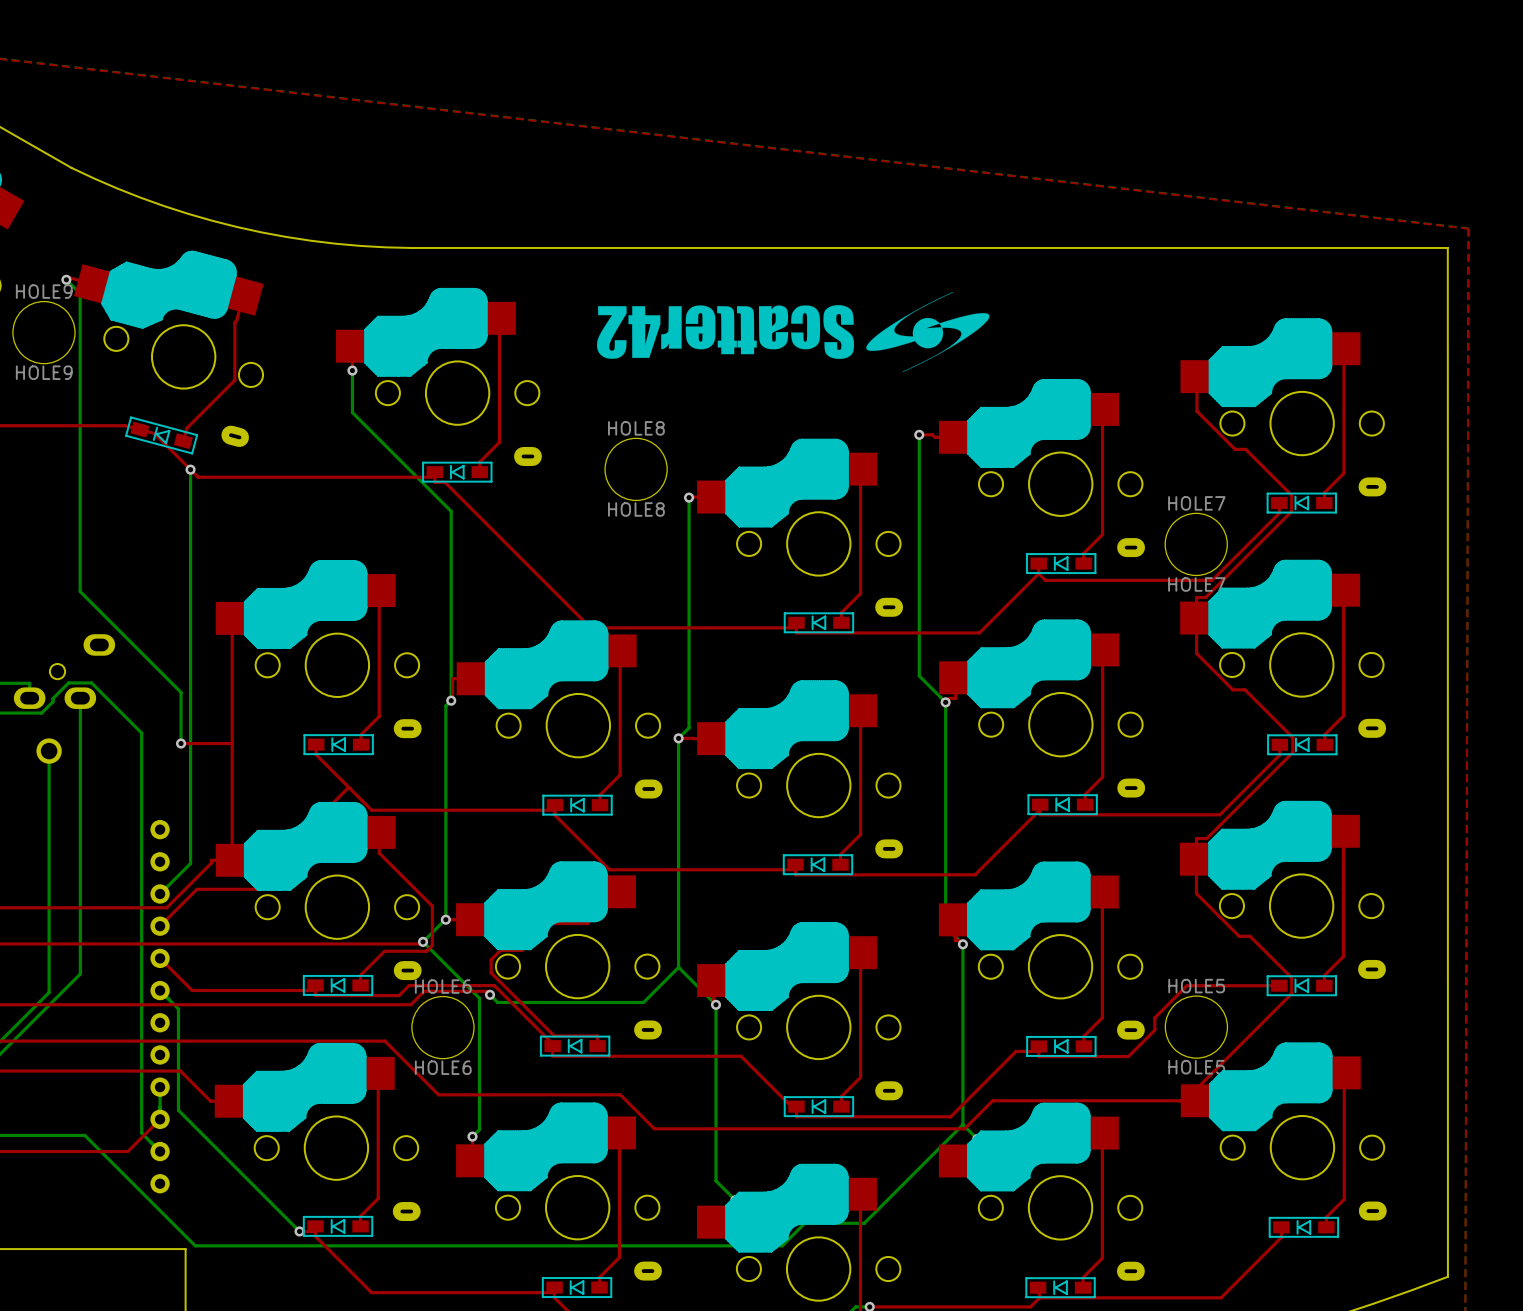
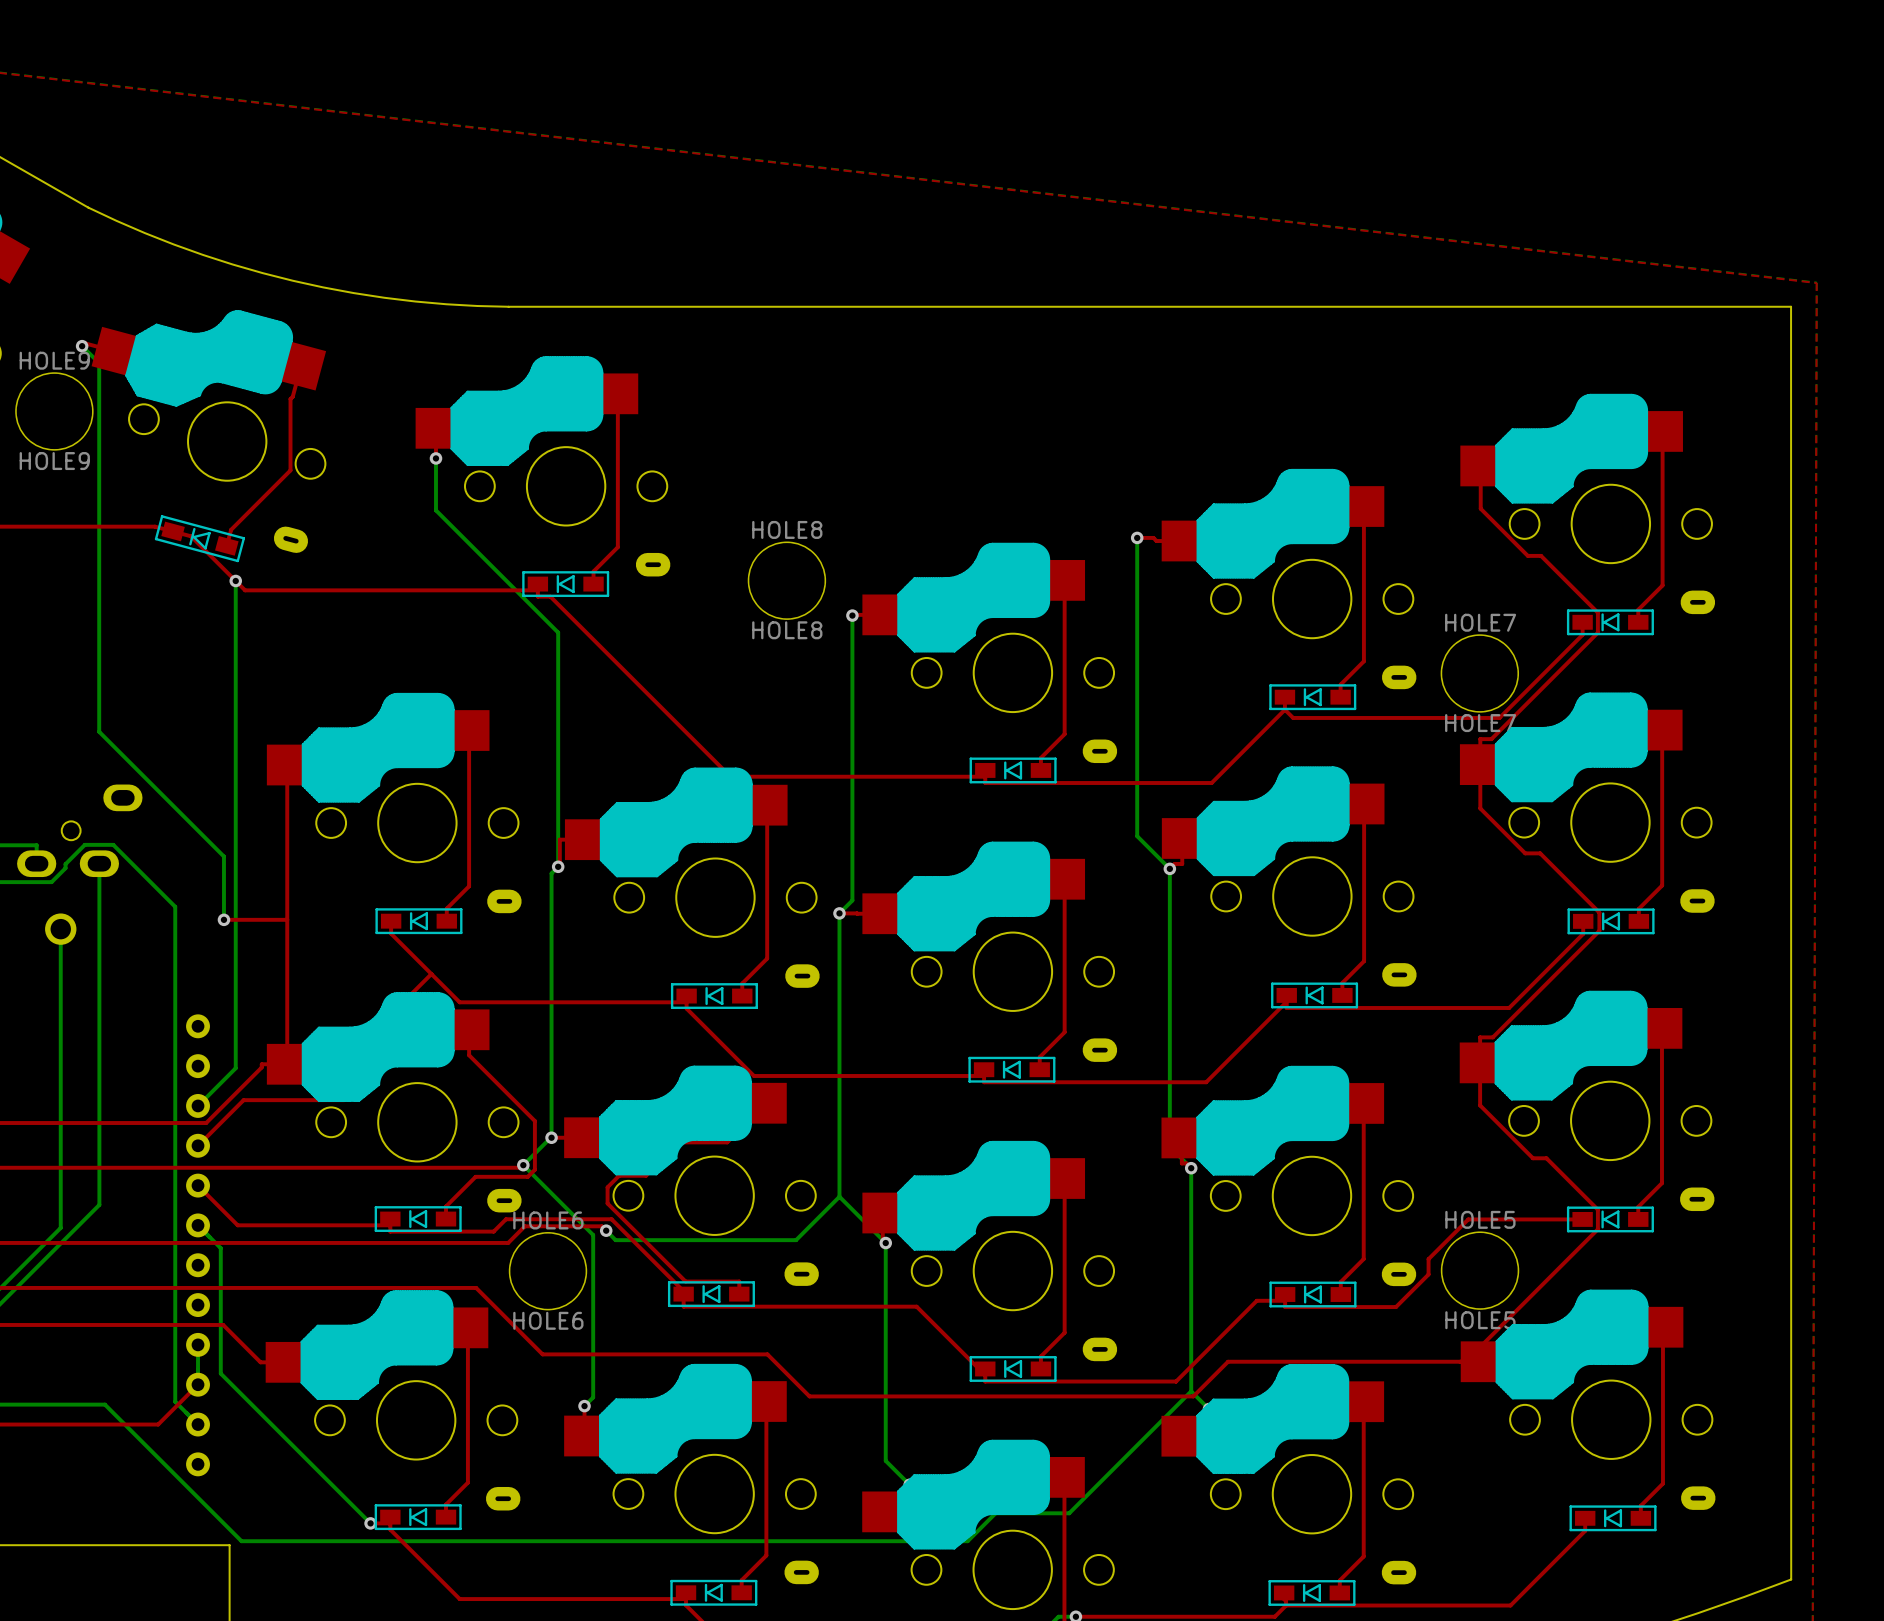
drawing: [596, 291, 990, 372] -> none

